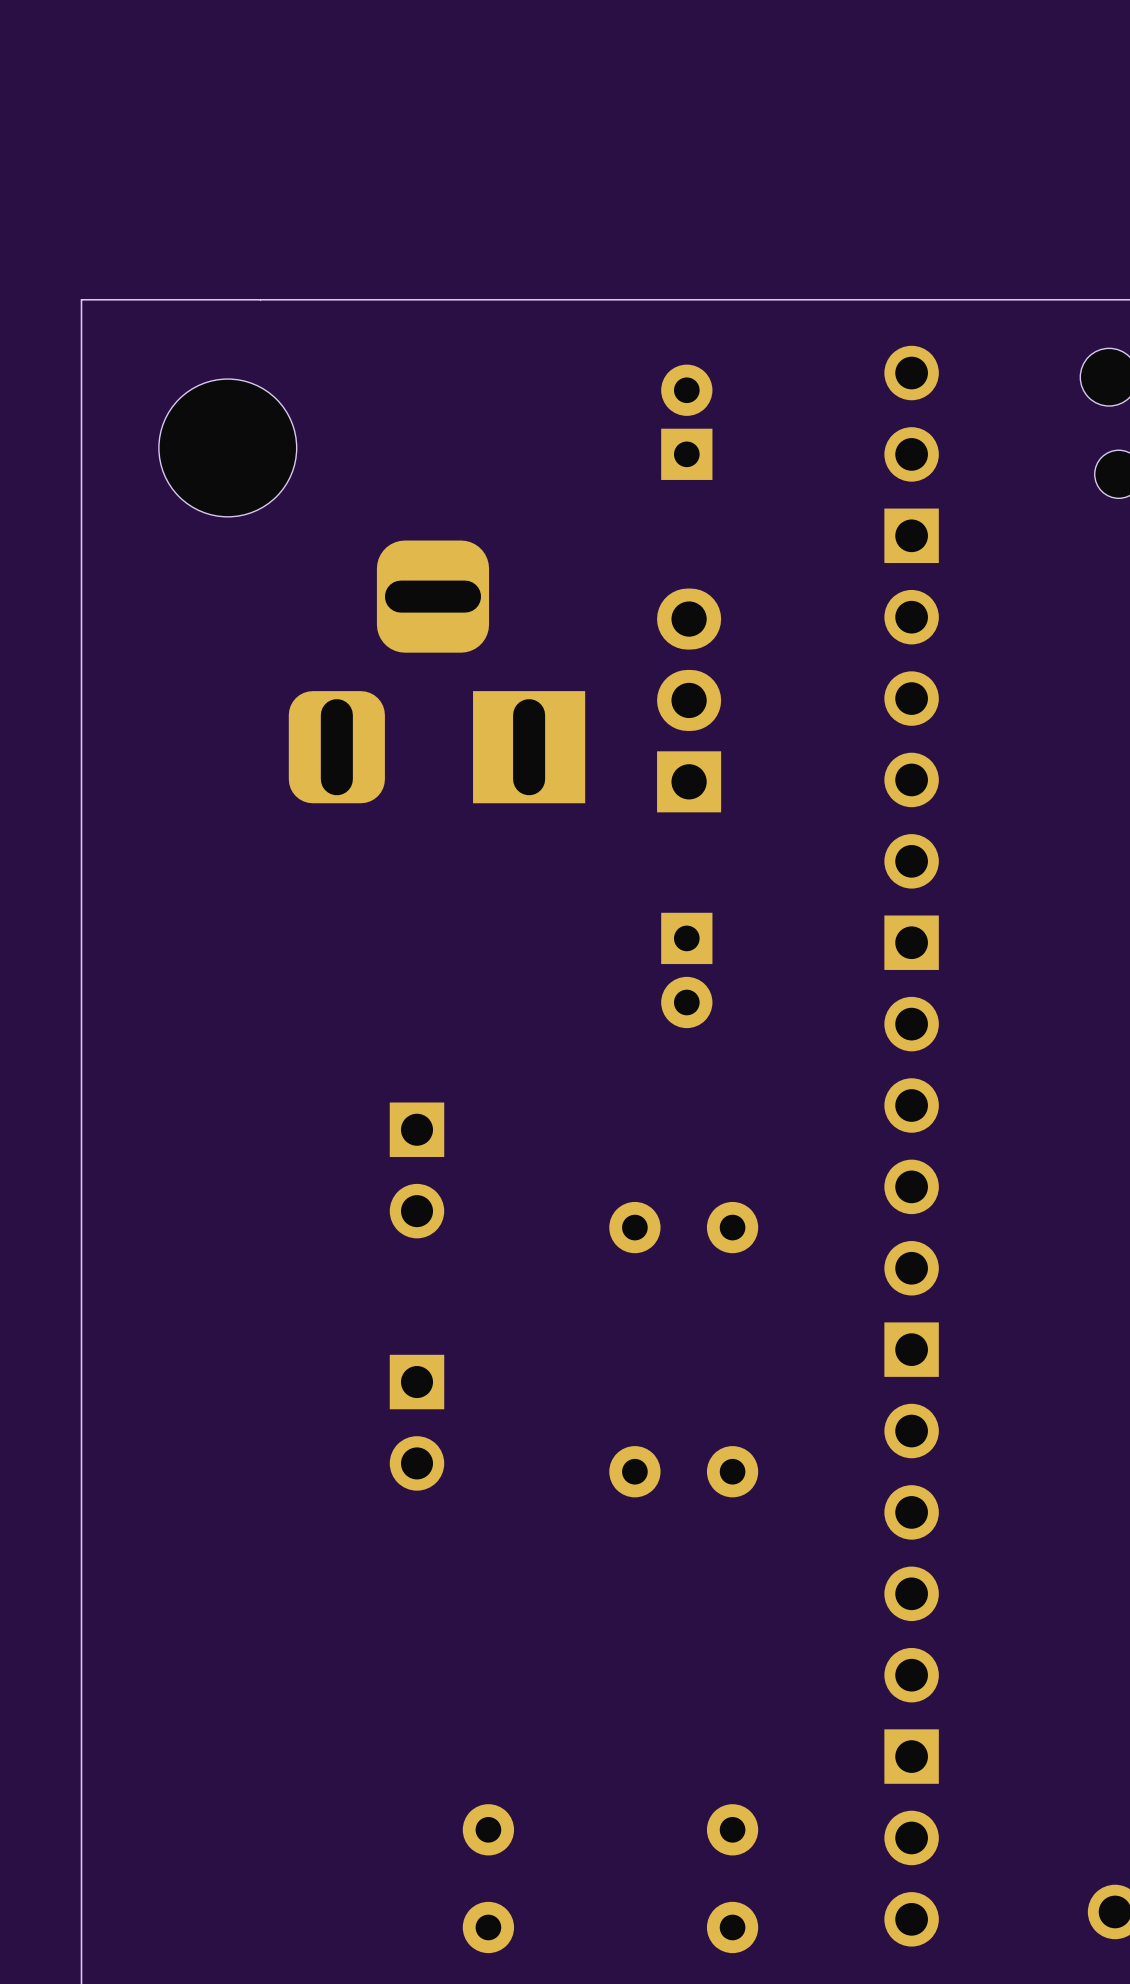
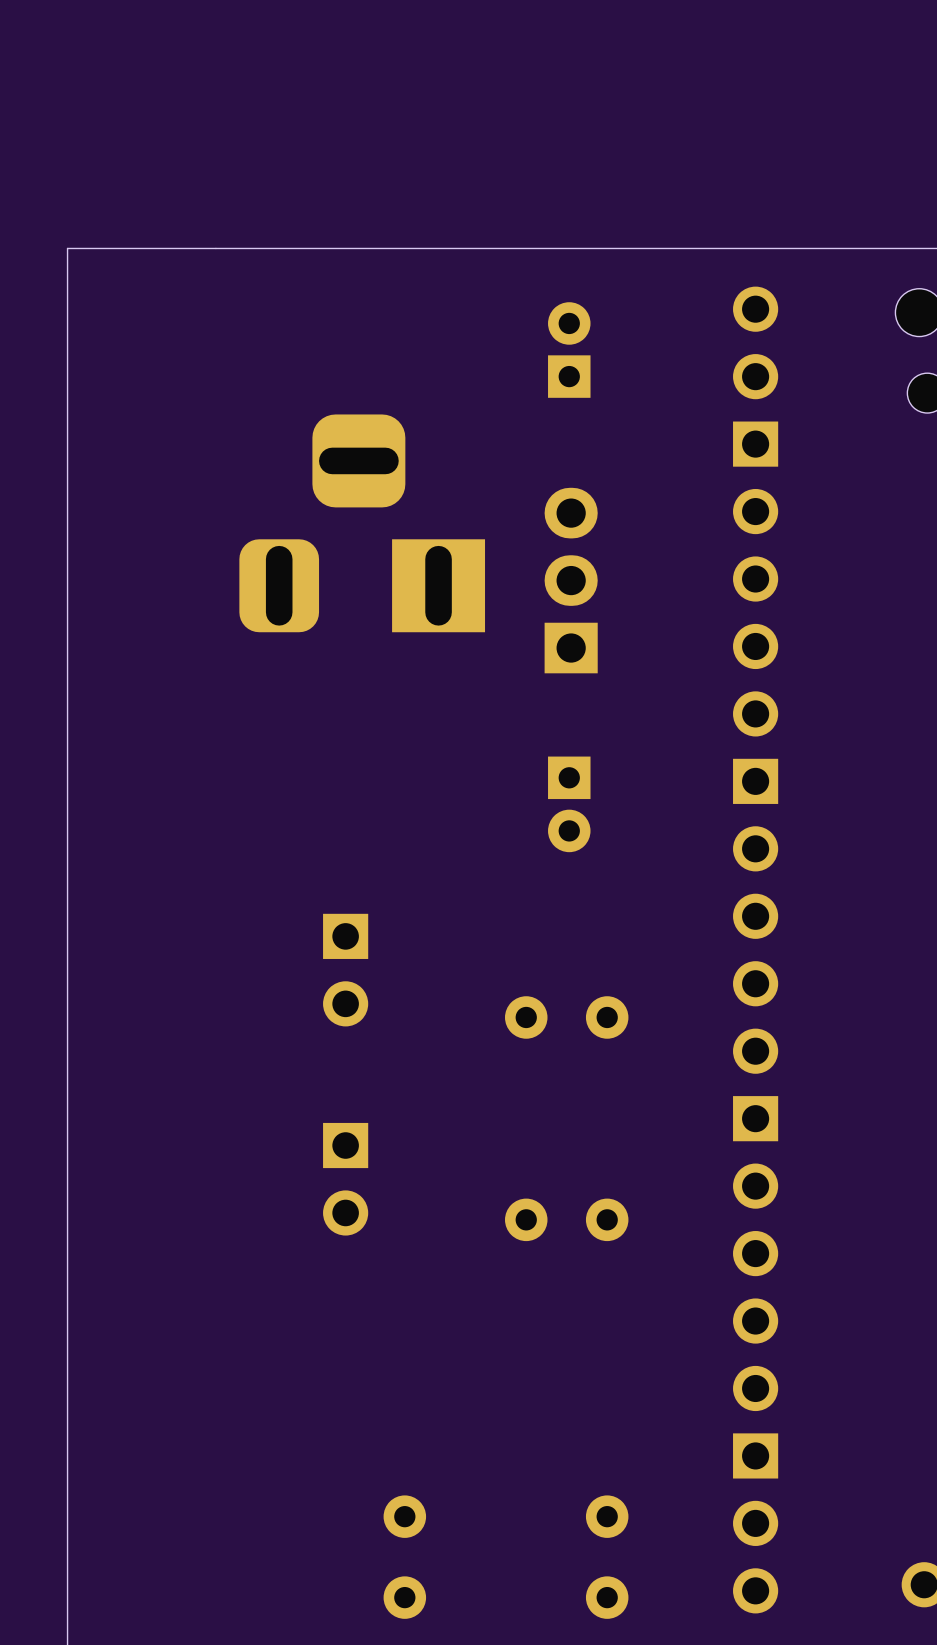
part: (227, 447) -> none
part position: (436, 671) -> (362, 523)

